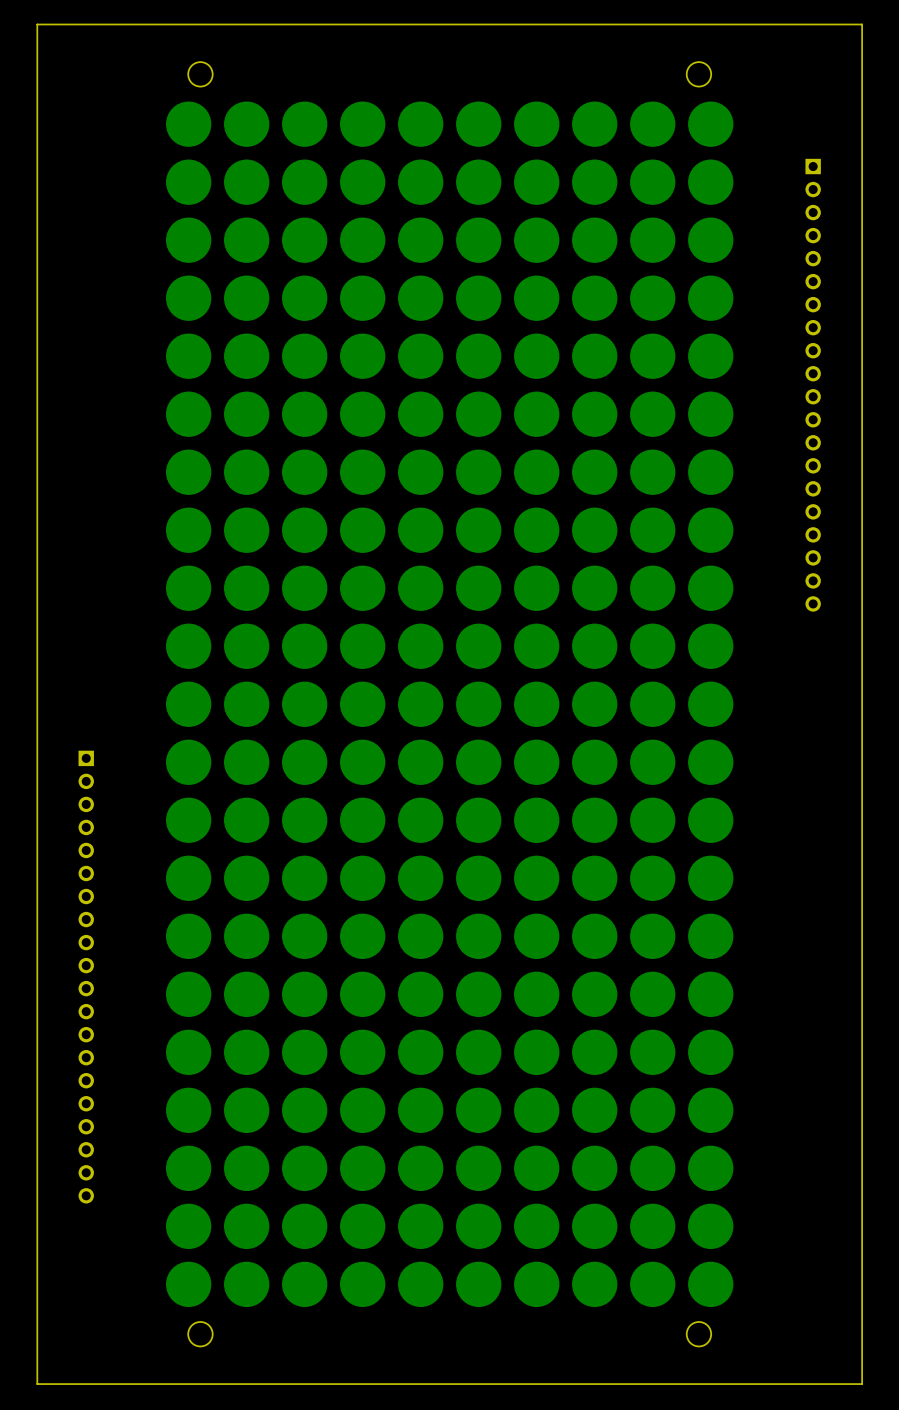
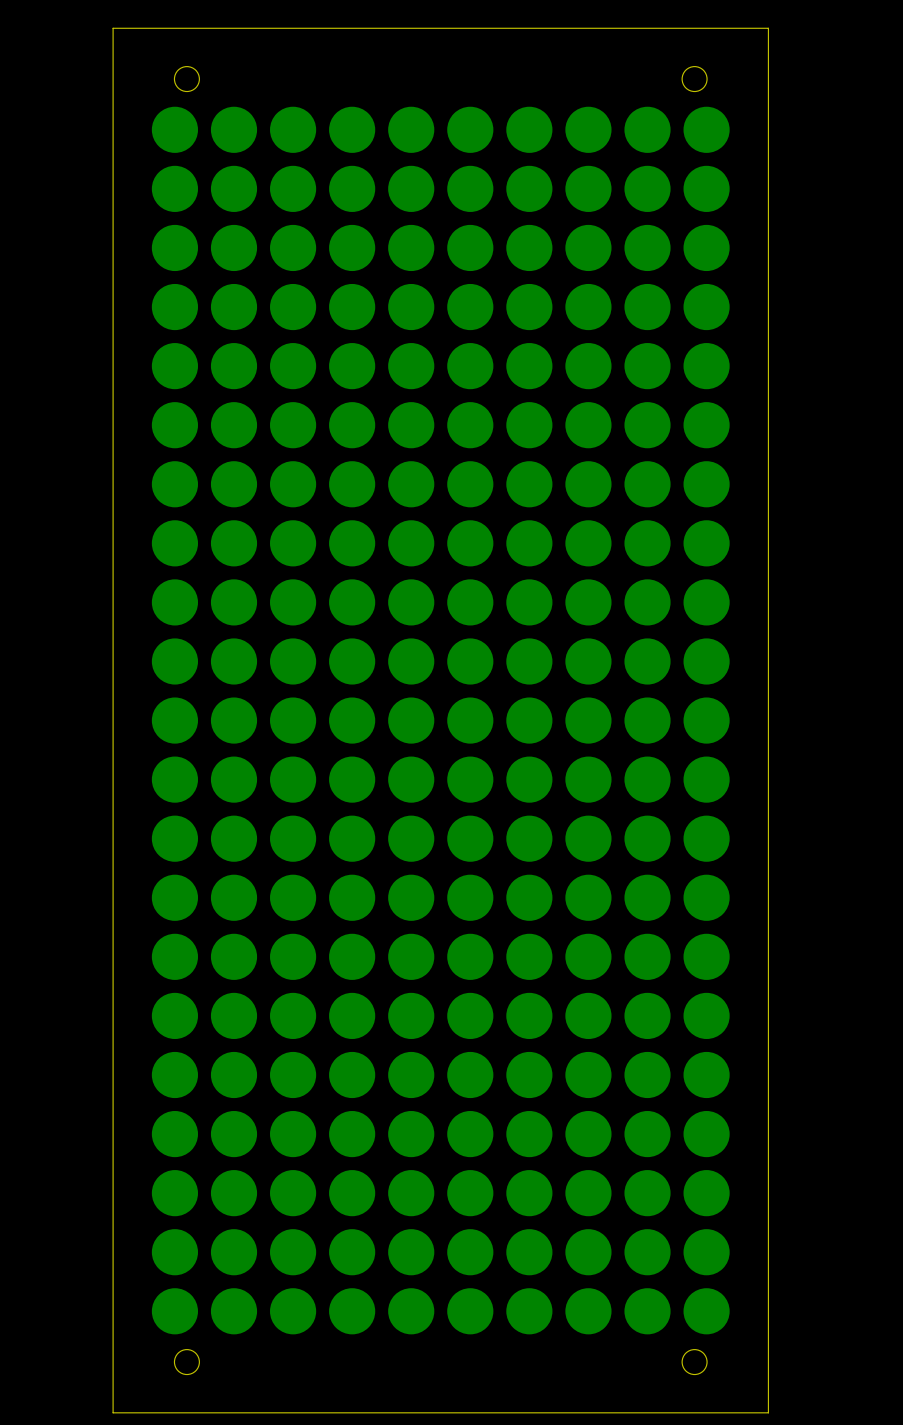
board edge: (127, 24) (37, 24) (37, 1384) (127, 1384) -> (113, 28) (113, 1412)
board edge: (771, 24) (862, 24) (862, 1384) (771, 1384) -> (768, 28) (768, 1412)
part: (813, 385) -> none
part: (86, 977) -> none

